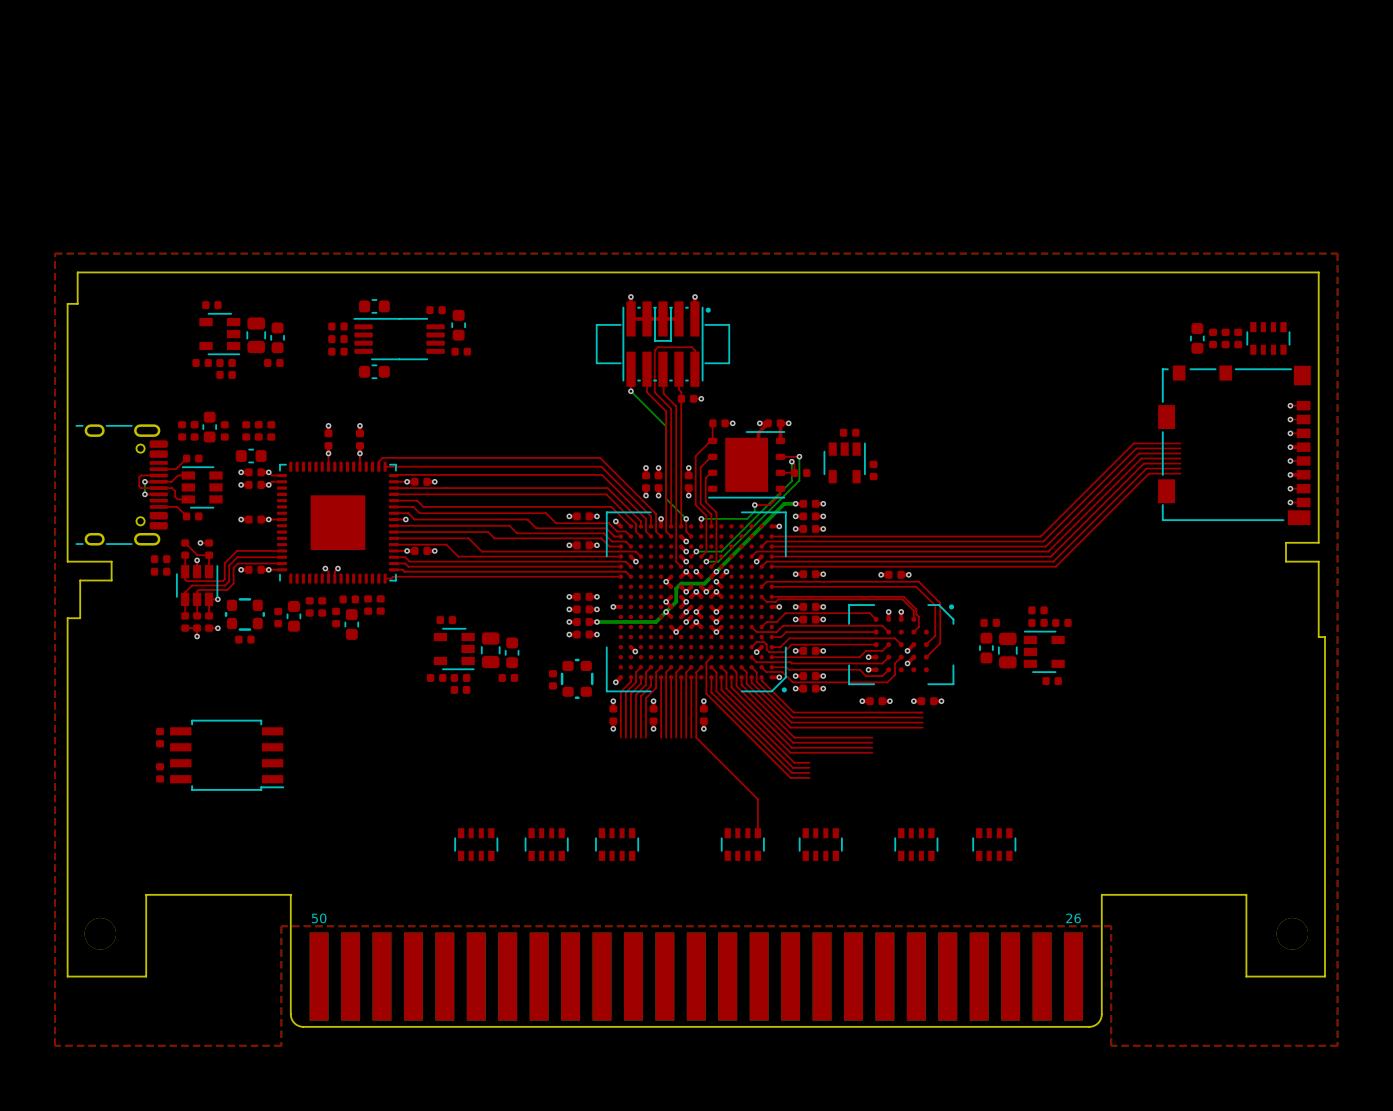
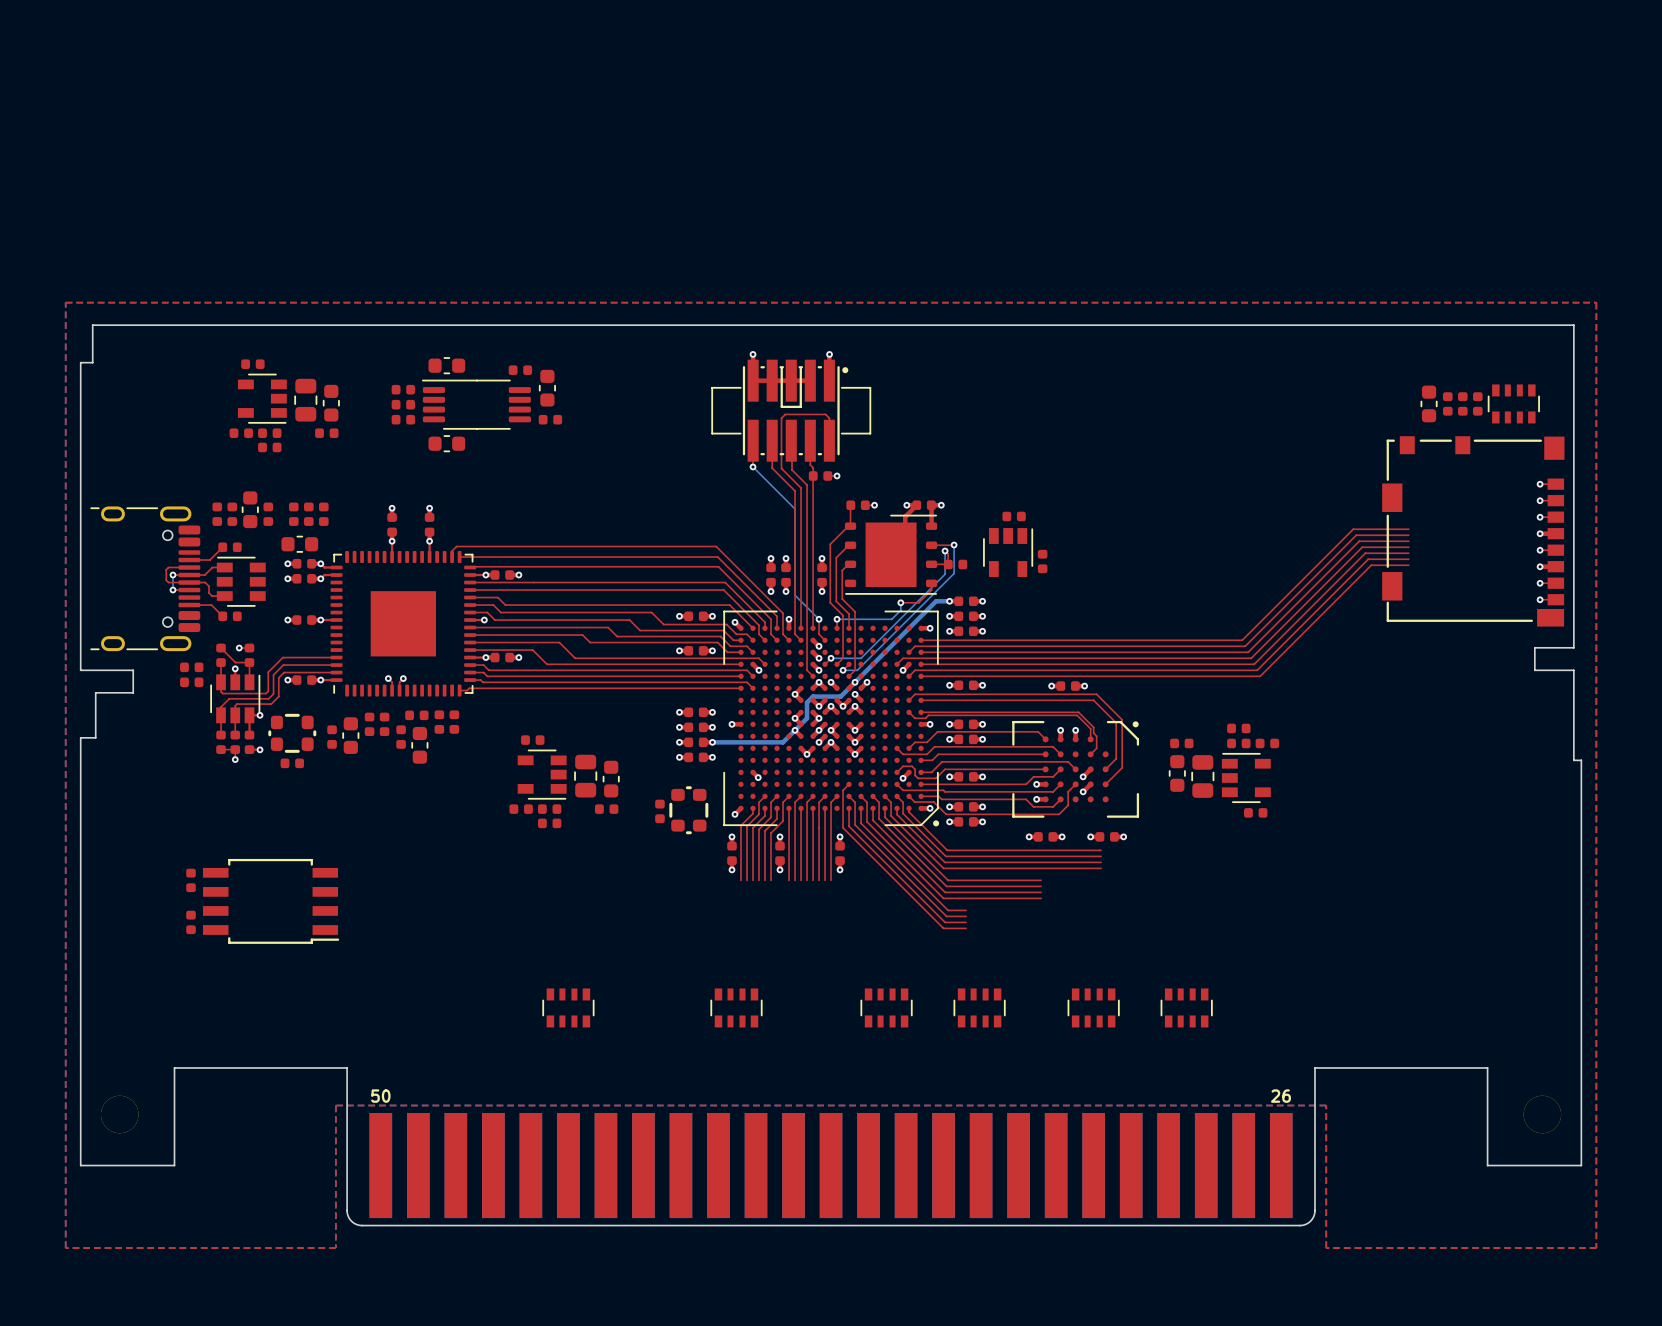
top track: (696, 737) (757, 799) (757, 833) -> none
part: (546, 844) -> none

